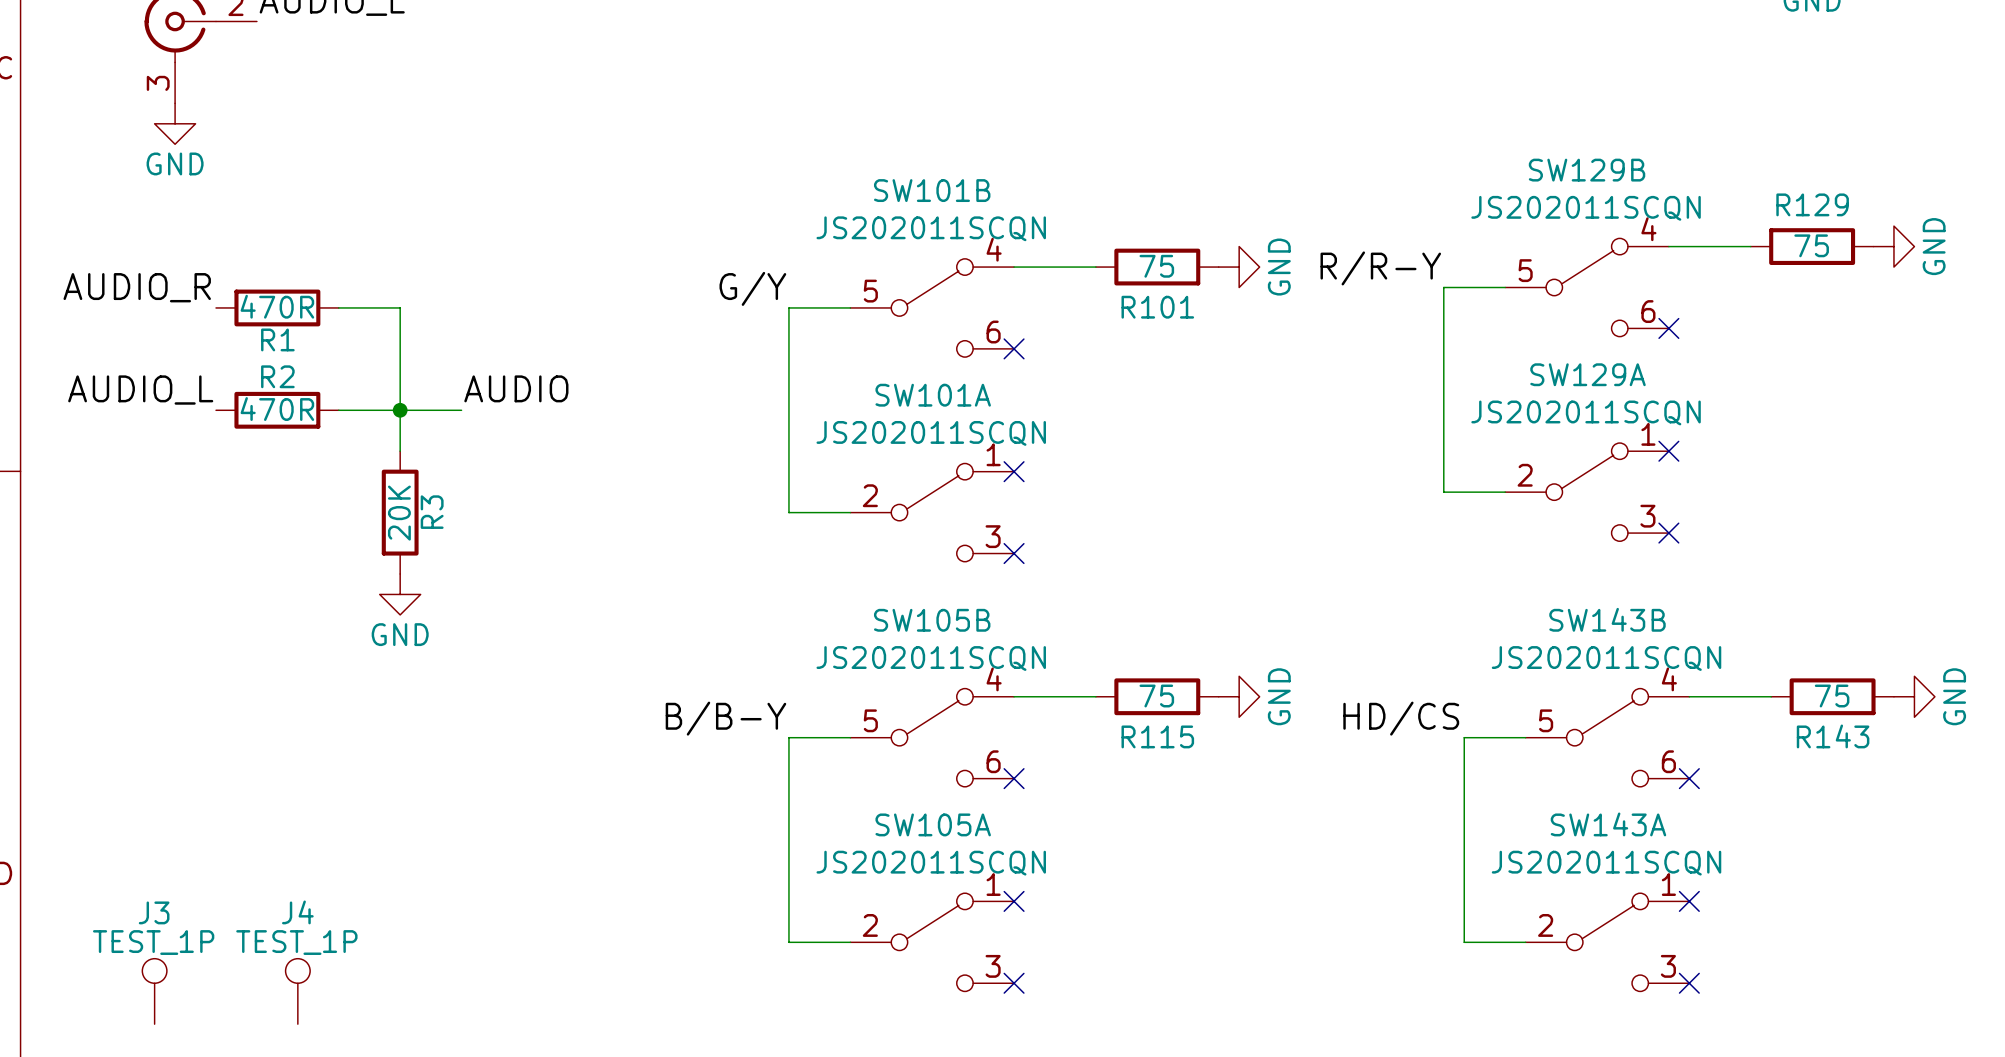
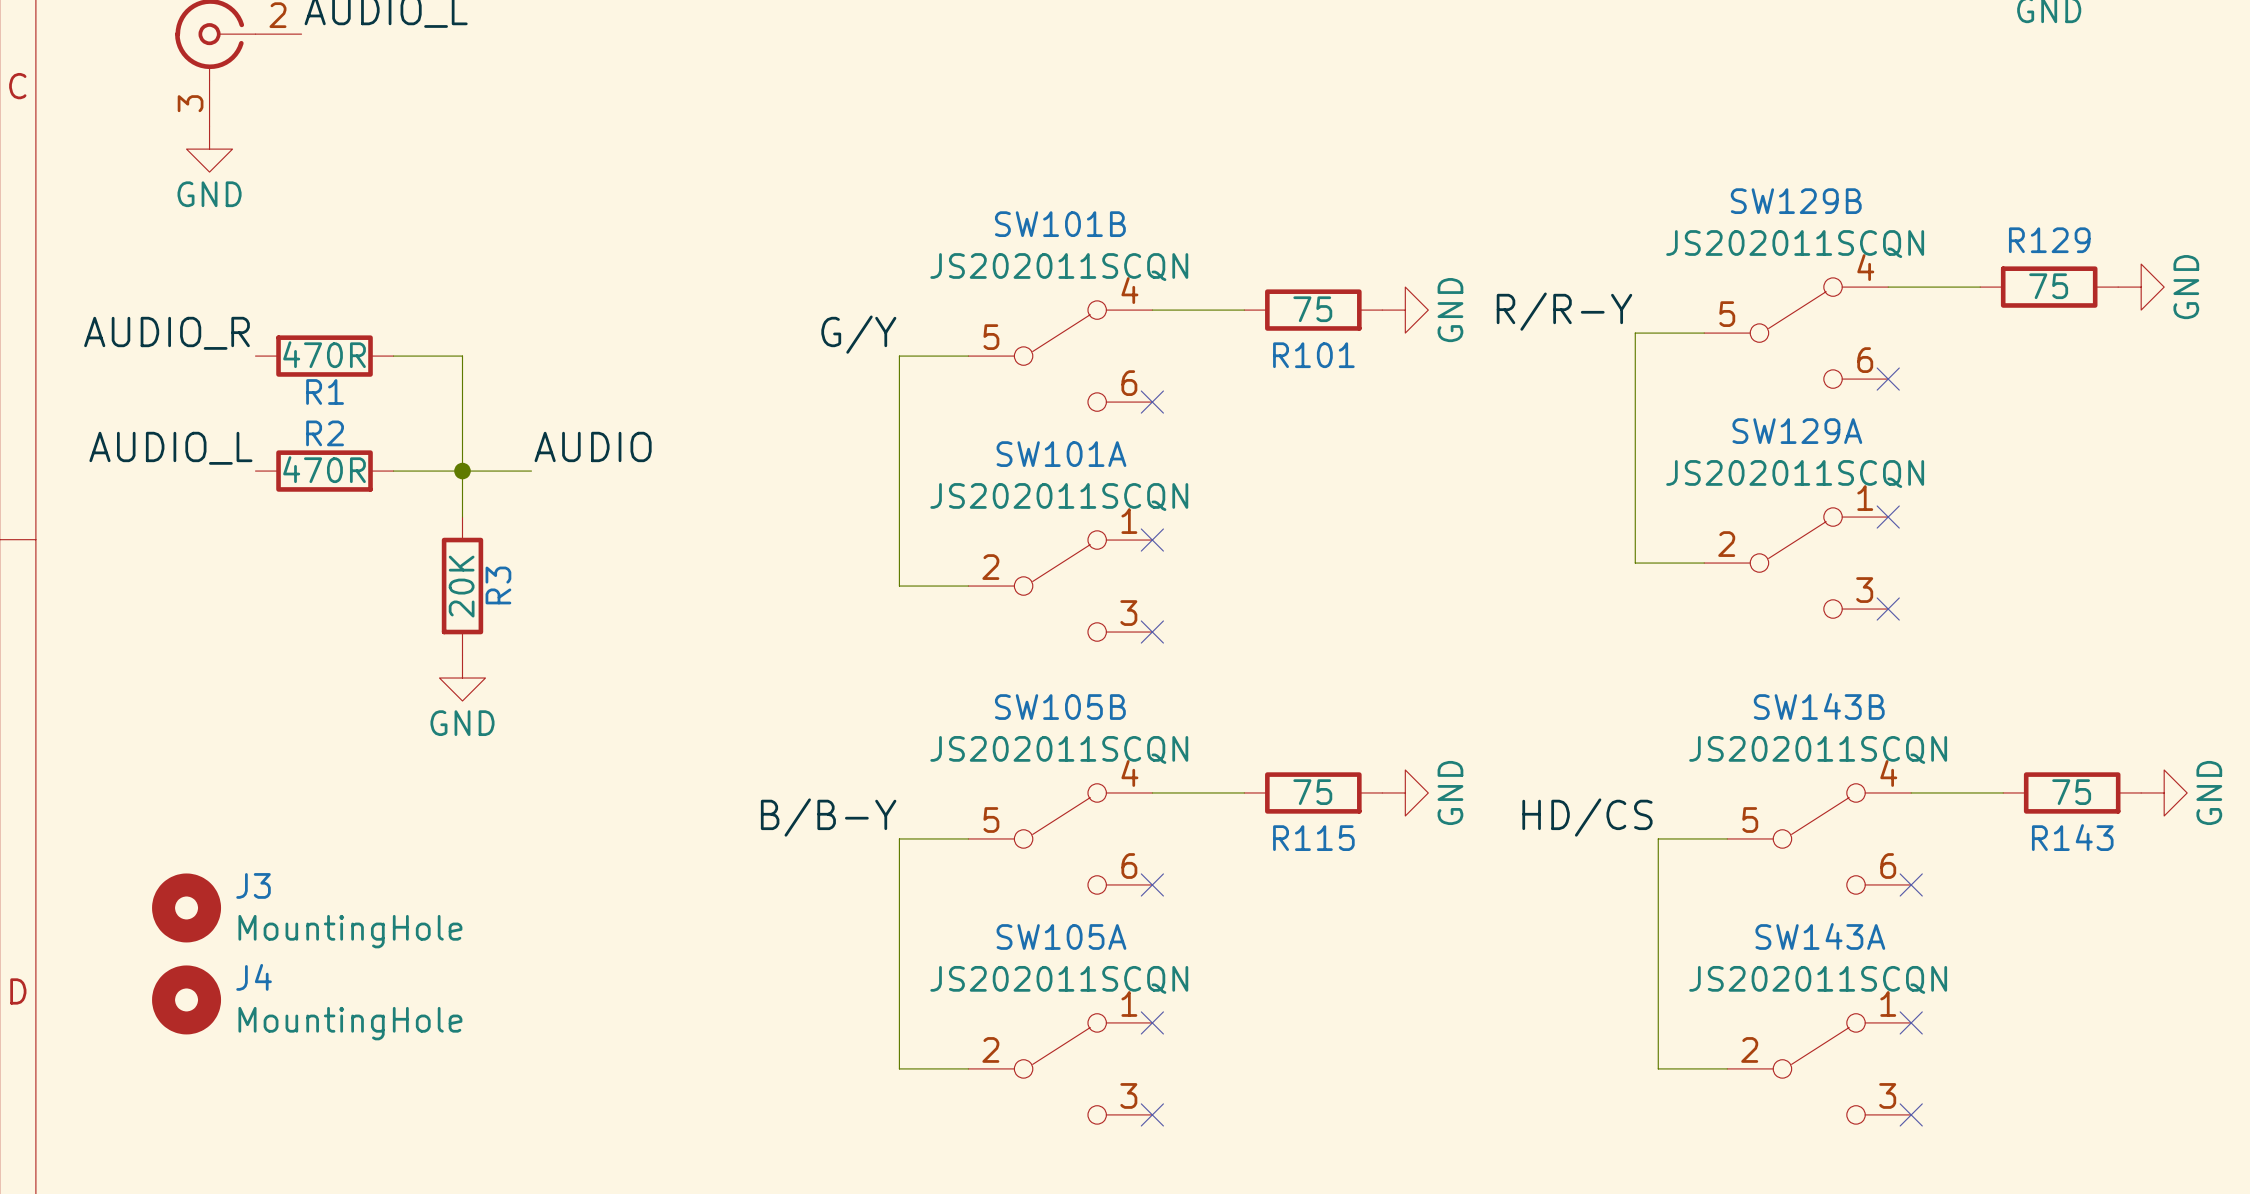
J3 name position: J3 (154, 912) -> J3 (253, 885)
J4 name position: J4 (297, 912) -> J4 (254, 977)
J3 value: TEST_1P (153, 942) -> MountingHole (350, 931)
J4 value: TEST_1P (296, 942) -> MountingHole (350, 1023)
J3 symbol: [142, 958, 167, 1025] -> [152, 873, 222, 943]
J4 symbol: [285, 958, 311, 1025] -> [152, 965, 222, 1035]

